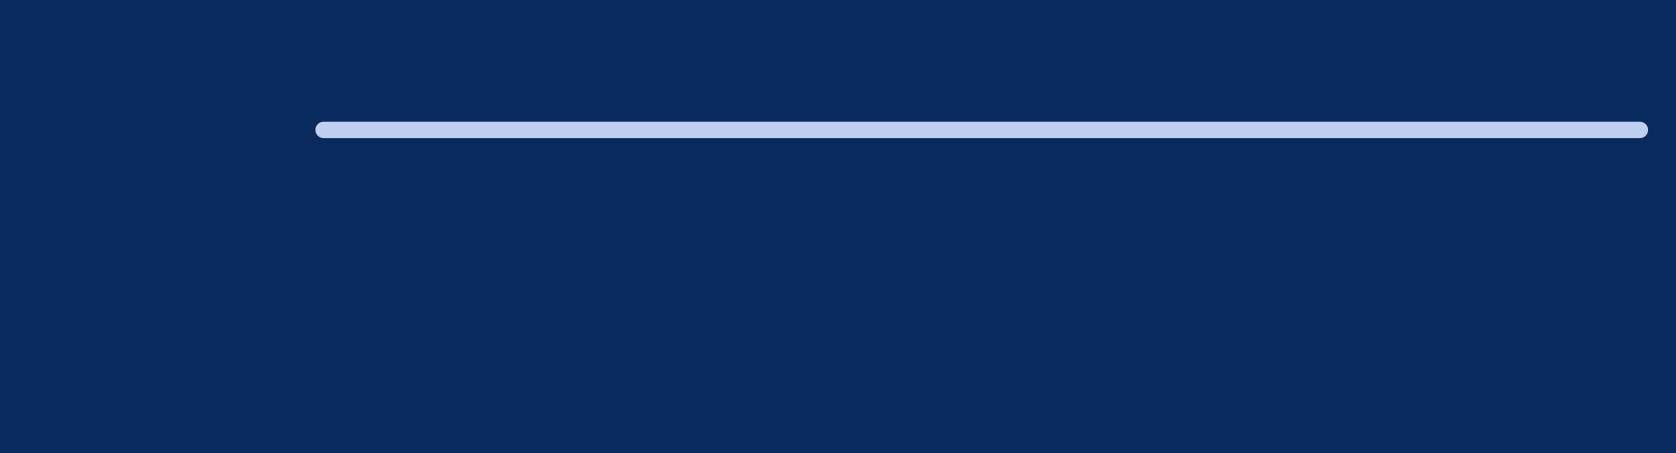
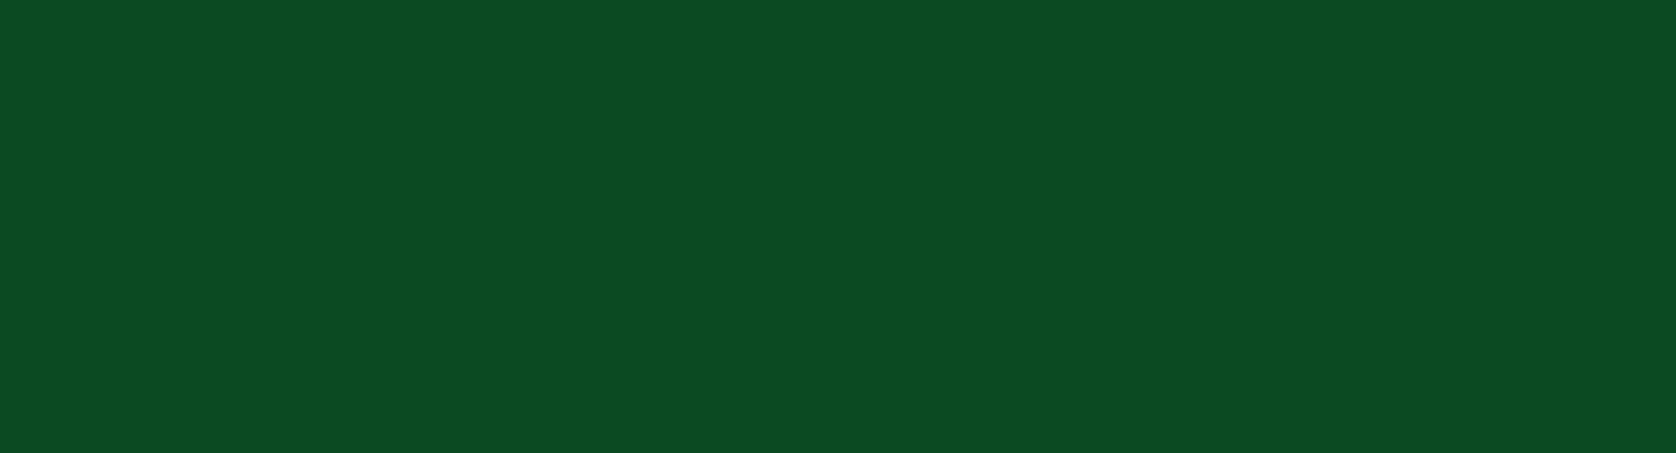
board edge: (1639, 129) (323, 129) -> none

